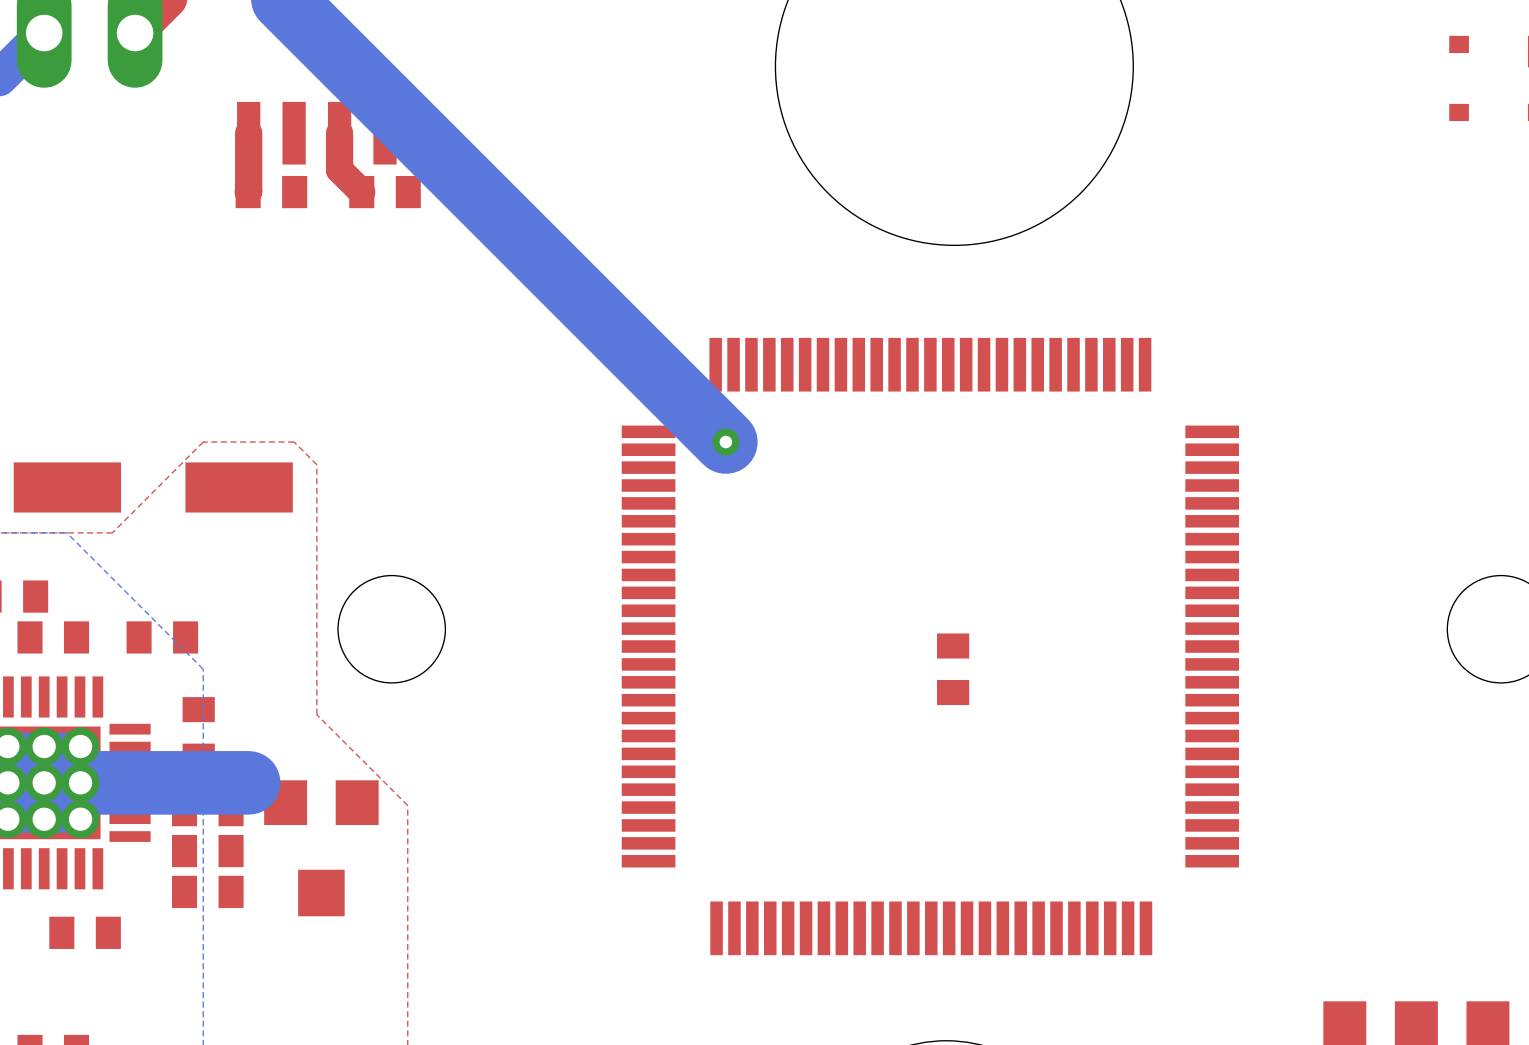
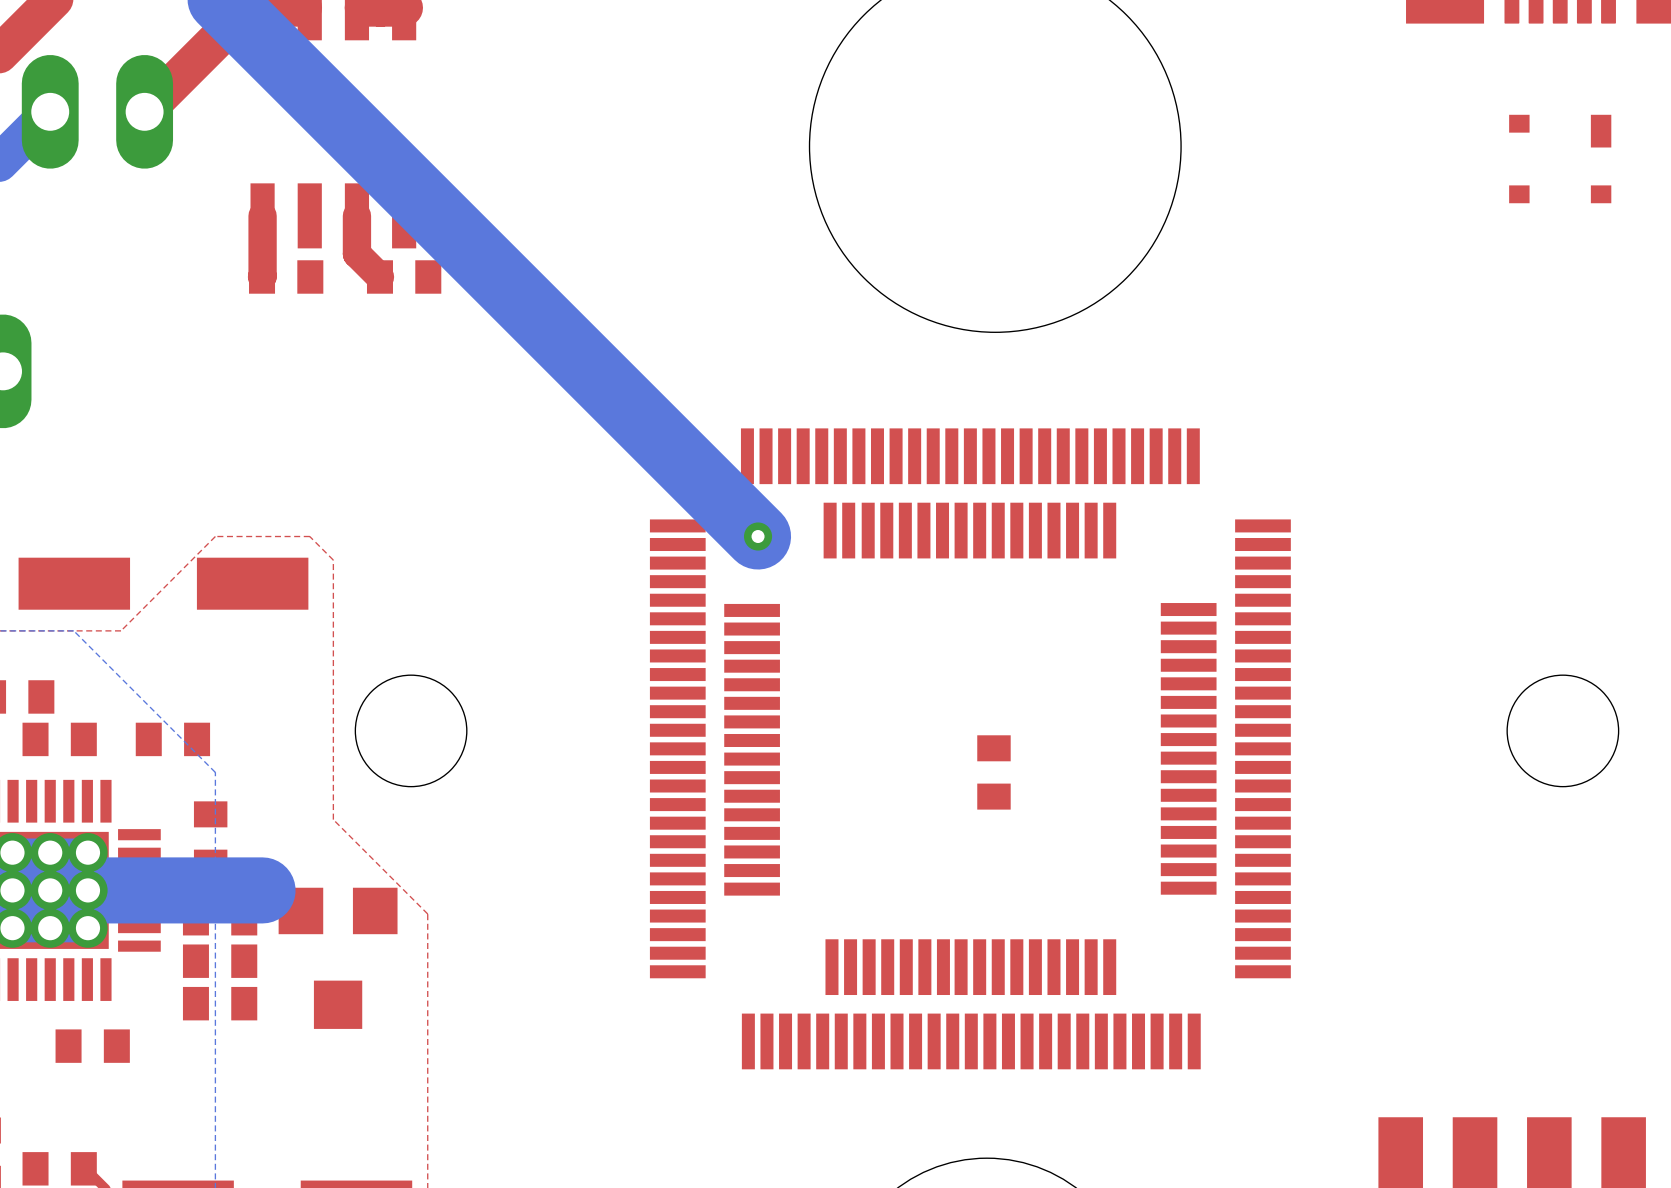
part: none -> (970, 748)

